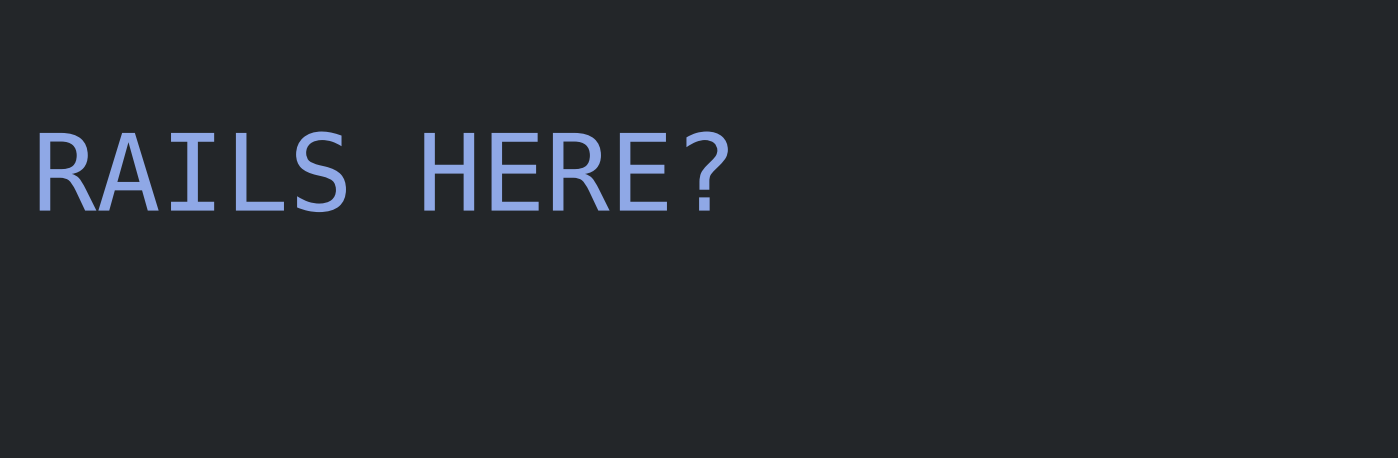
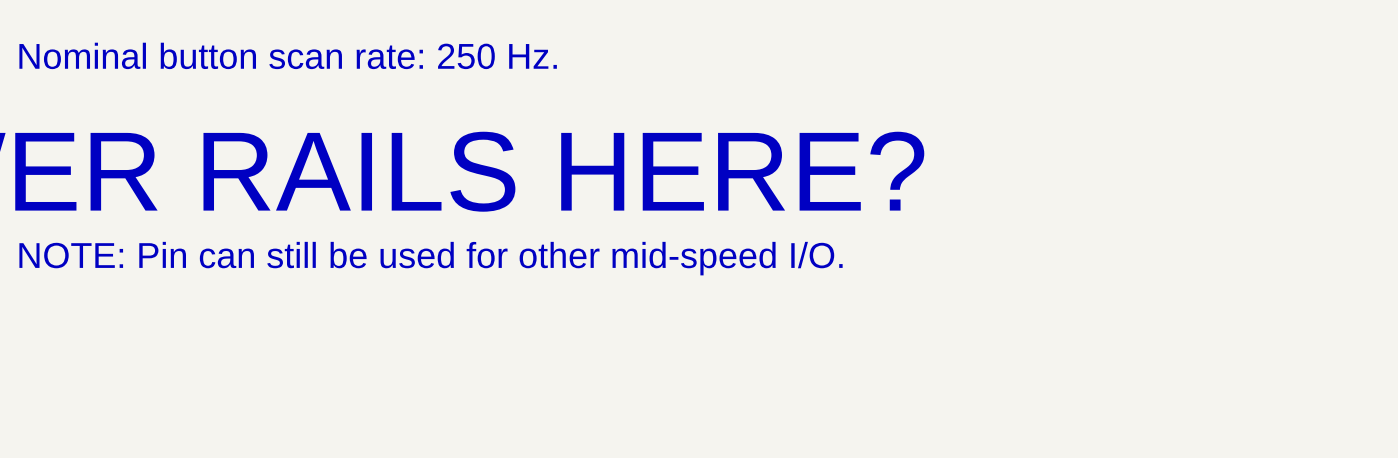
text: none -> Nominal button scan rate: 250 Hz. (288, 55)
text: none -> NOTE: Pin can still be used for other mid-speed I/O. (431, 258)

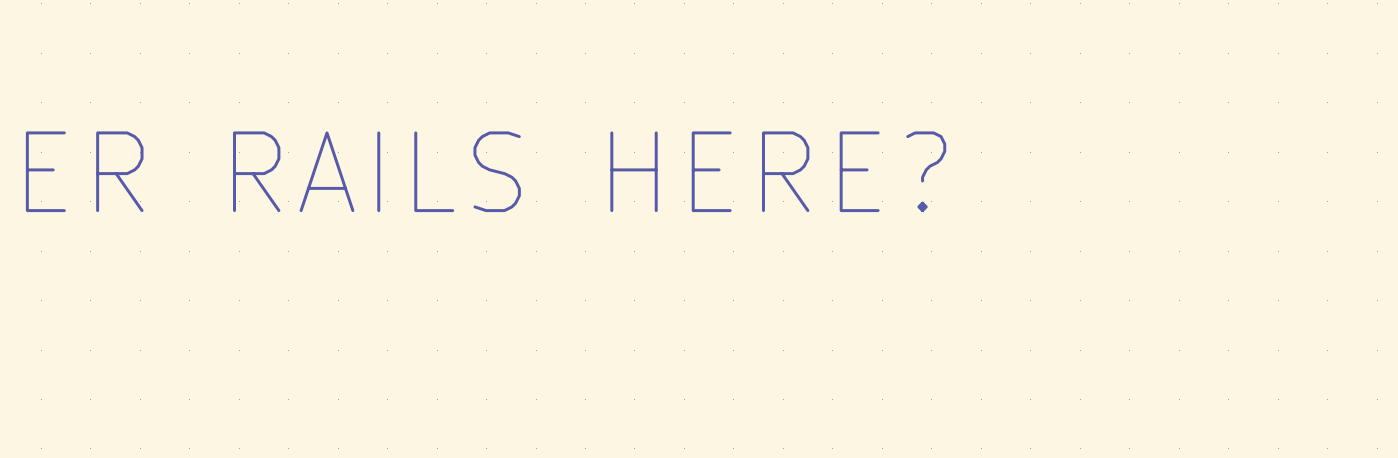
text: Nominal button scan rate: 250 Hz. (288, 55) -> none
text: NOTE: Pin can still be used for other mid-speed I/O. (431, 258) -> none

